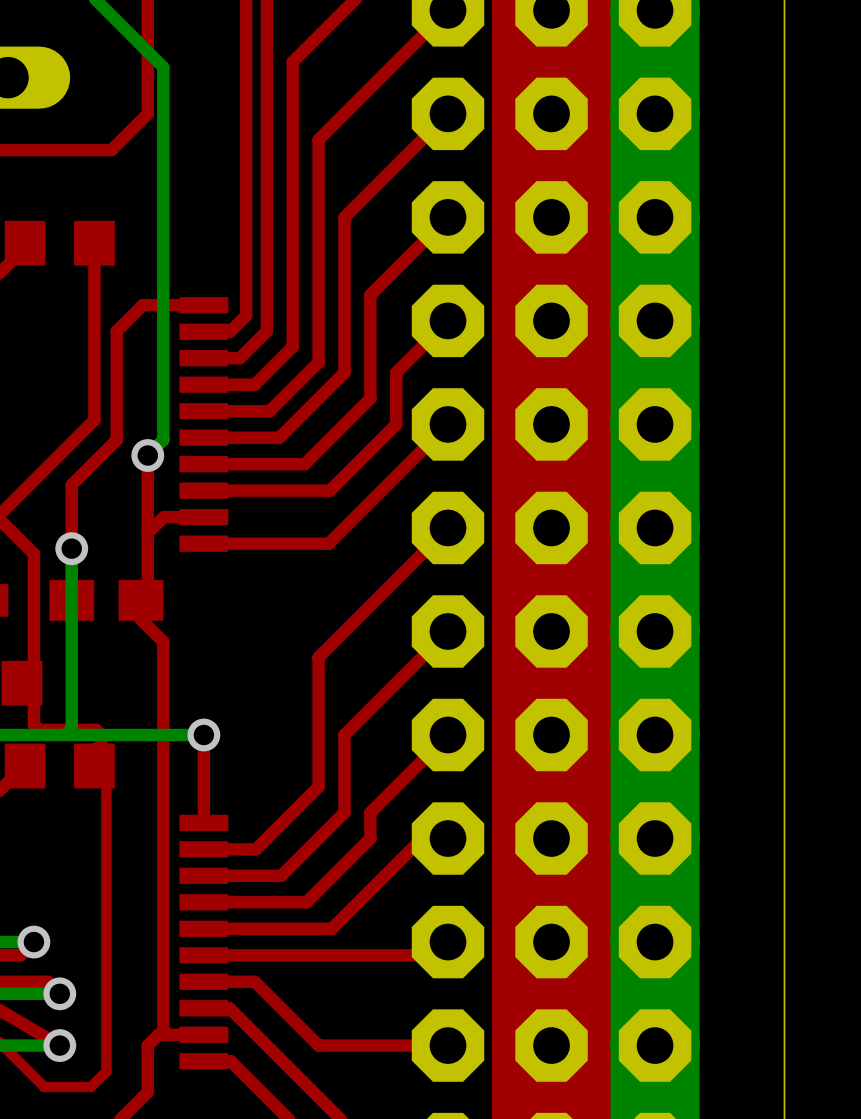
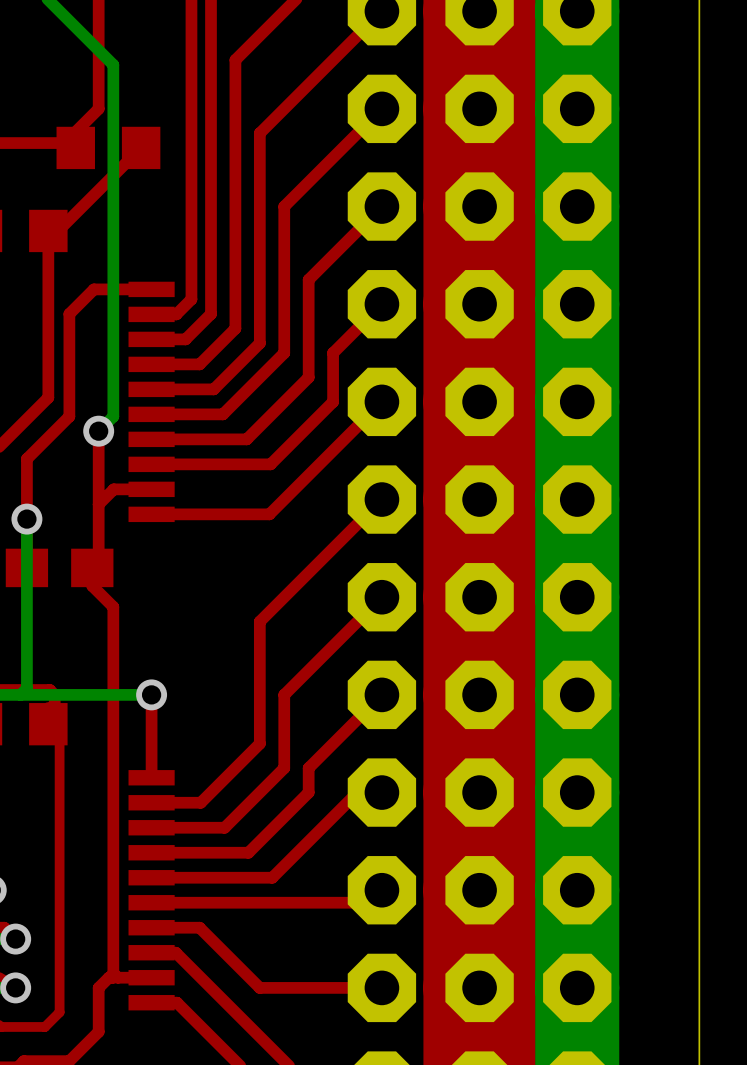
part: none -> (108, 147)
top track: none -> (141, 147) (58, 230) (48, 230)

